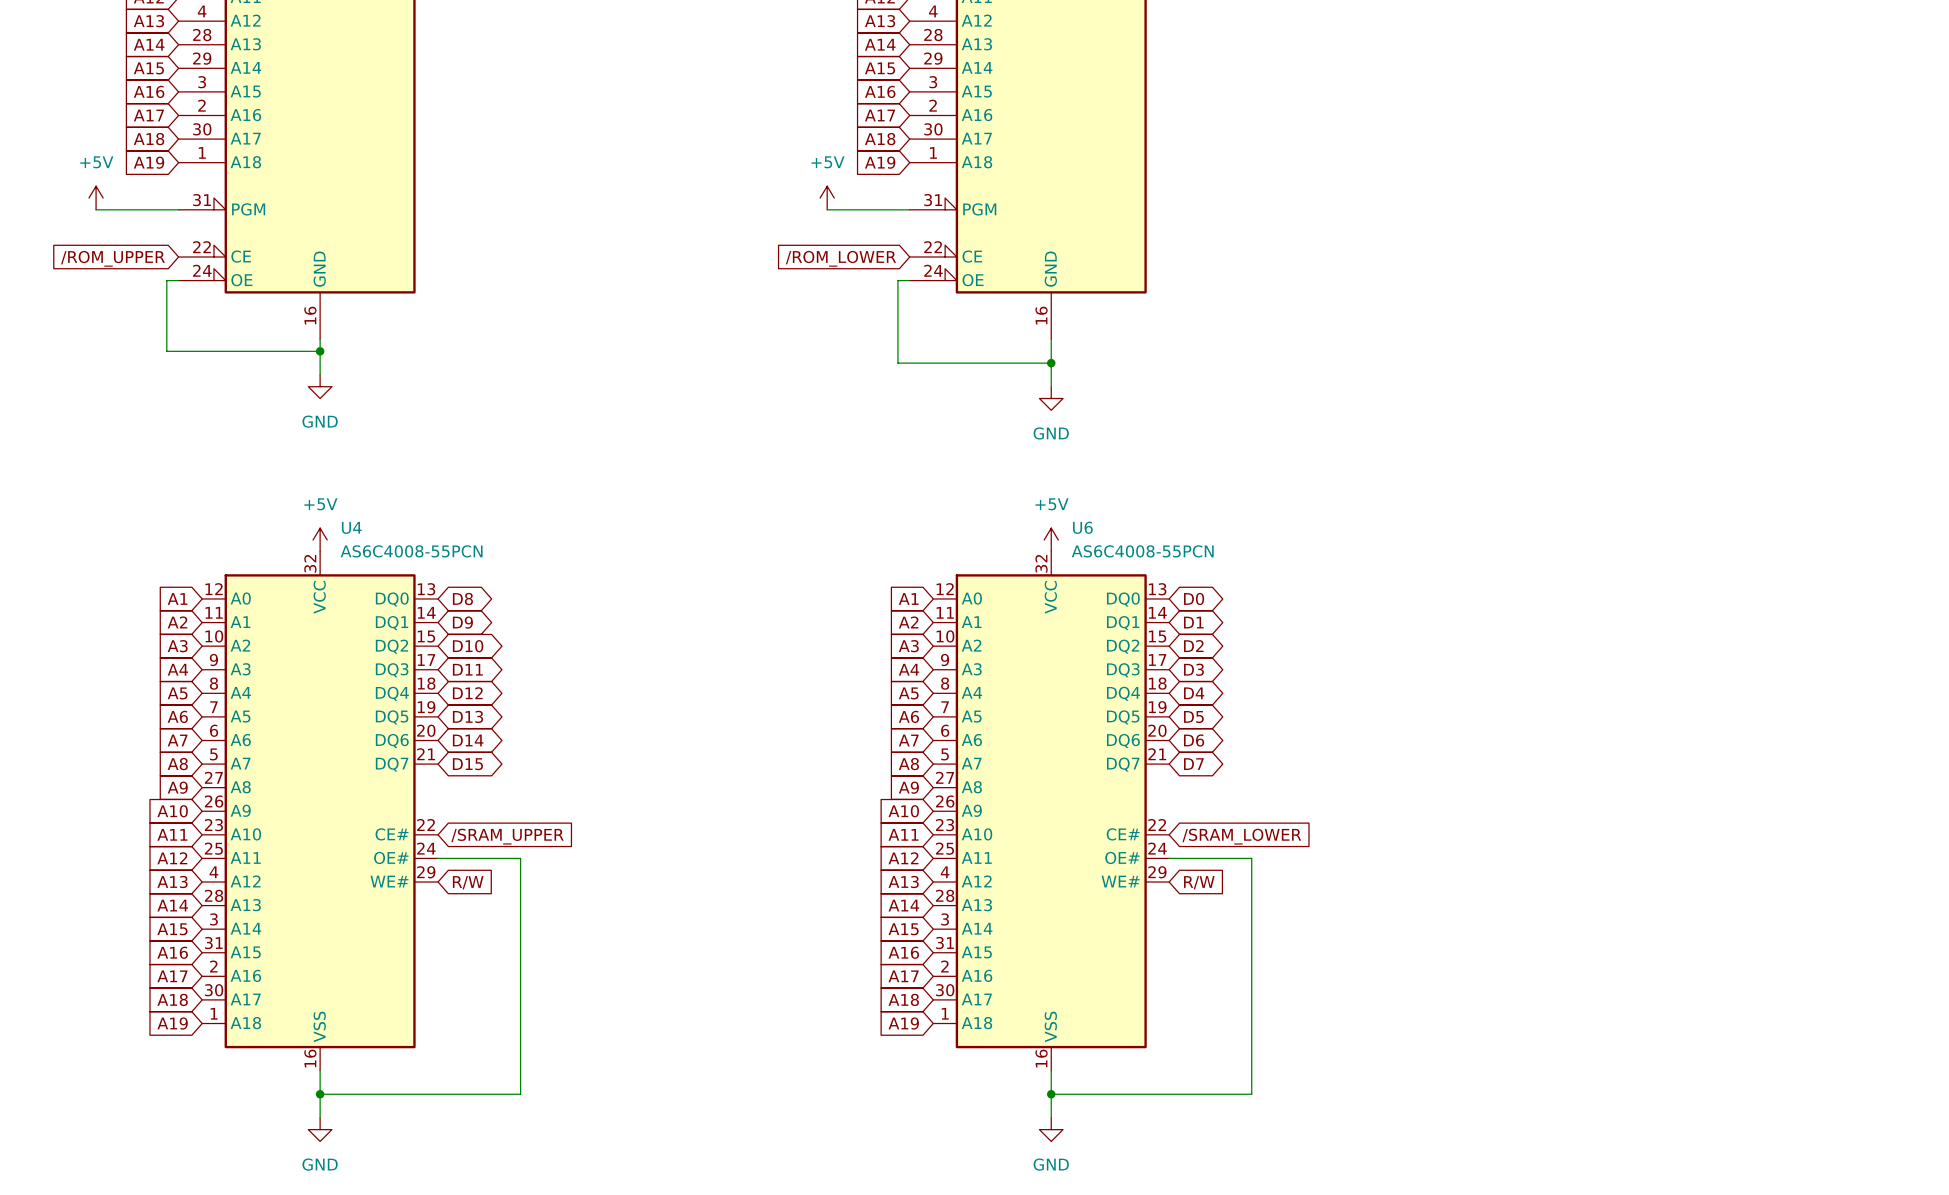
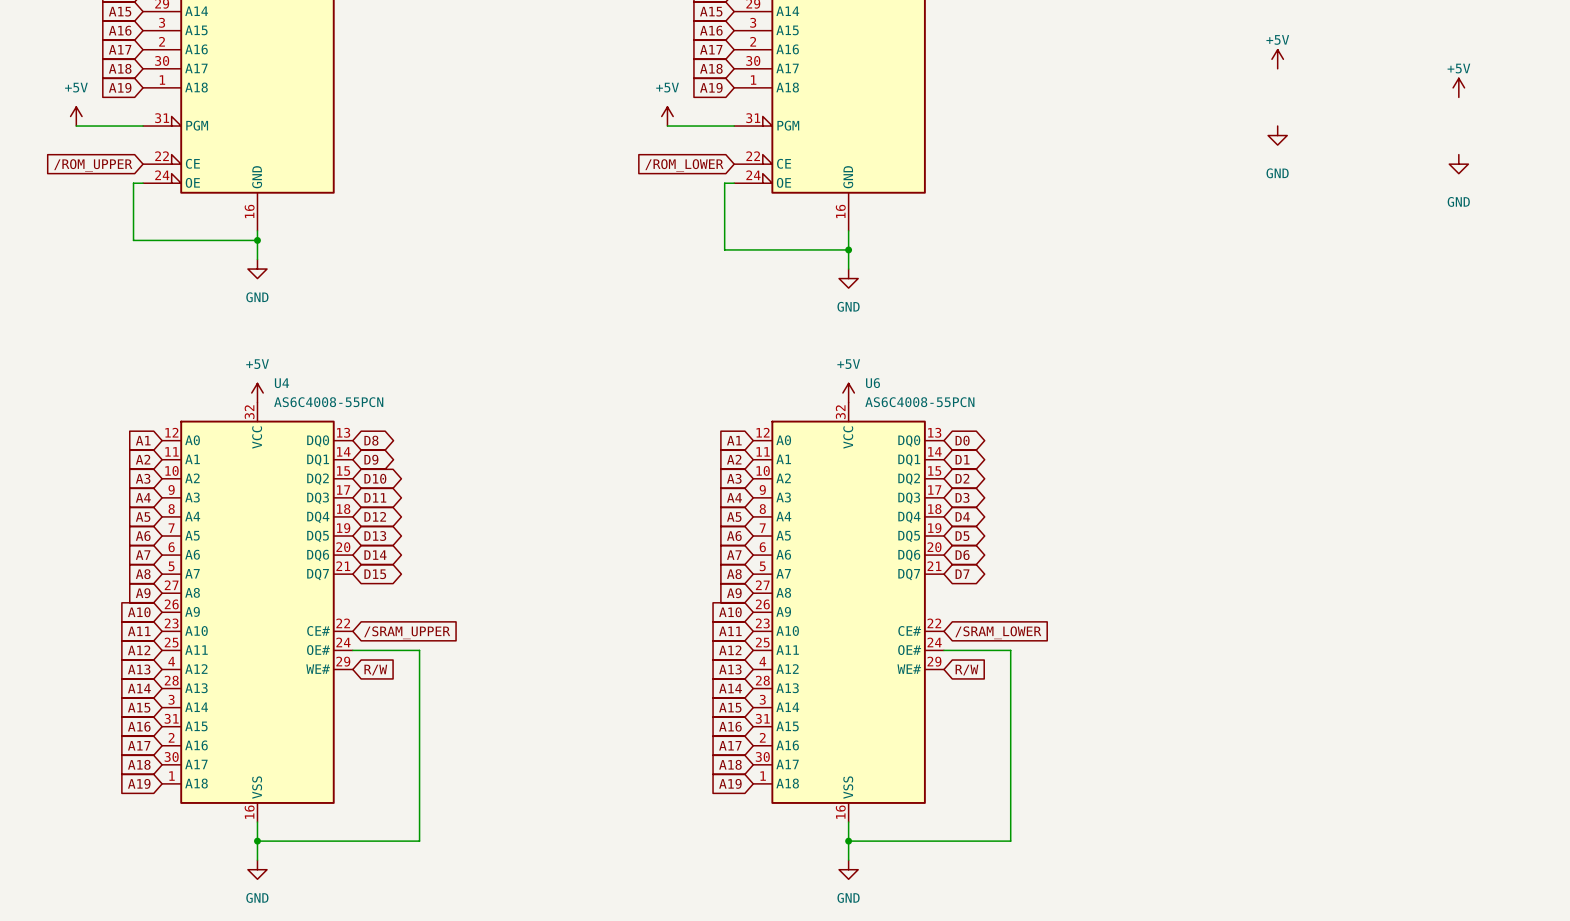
power symbol: none -> +5V (1277, 59)
power symbol: none -> +5V (1458, 87)
power symbol: none -> GND (1277, 135)
power symbol: none -> GND (1458, 164)

